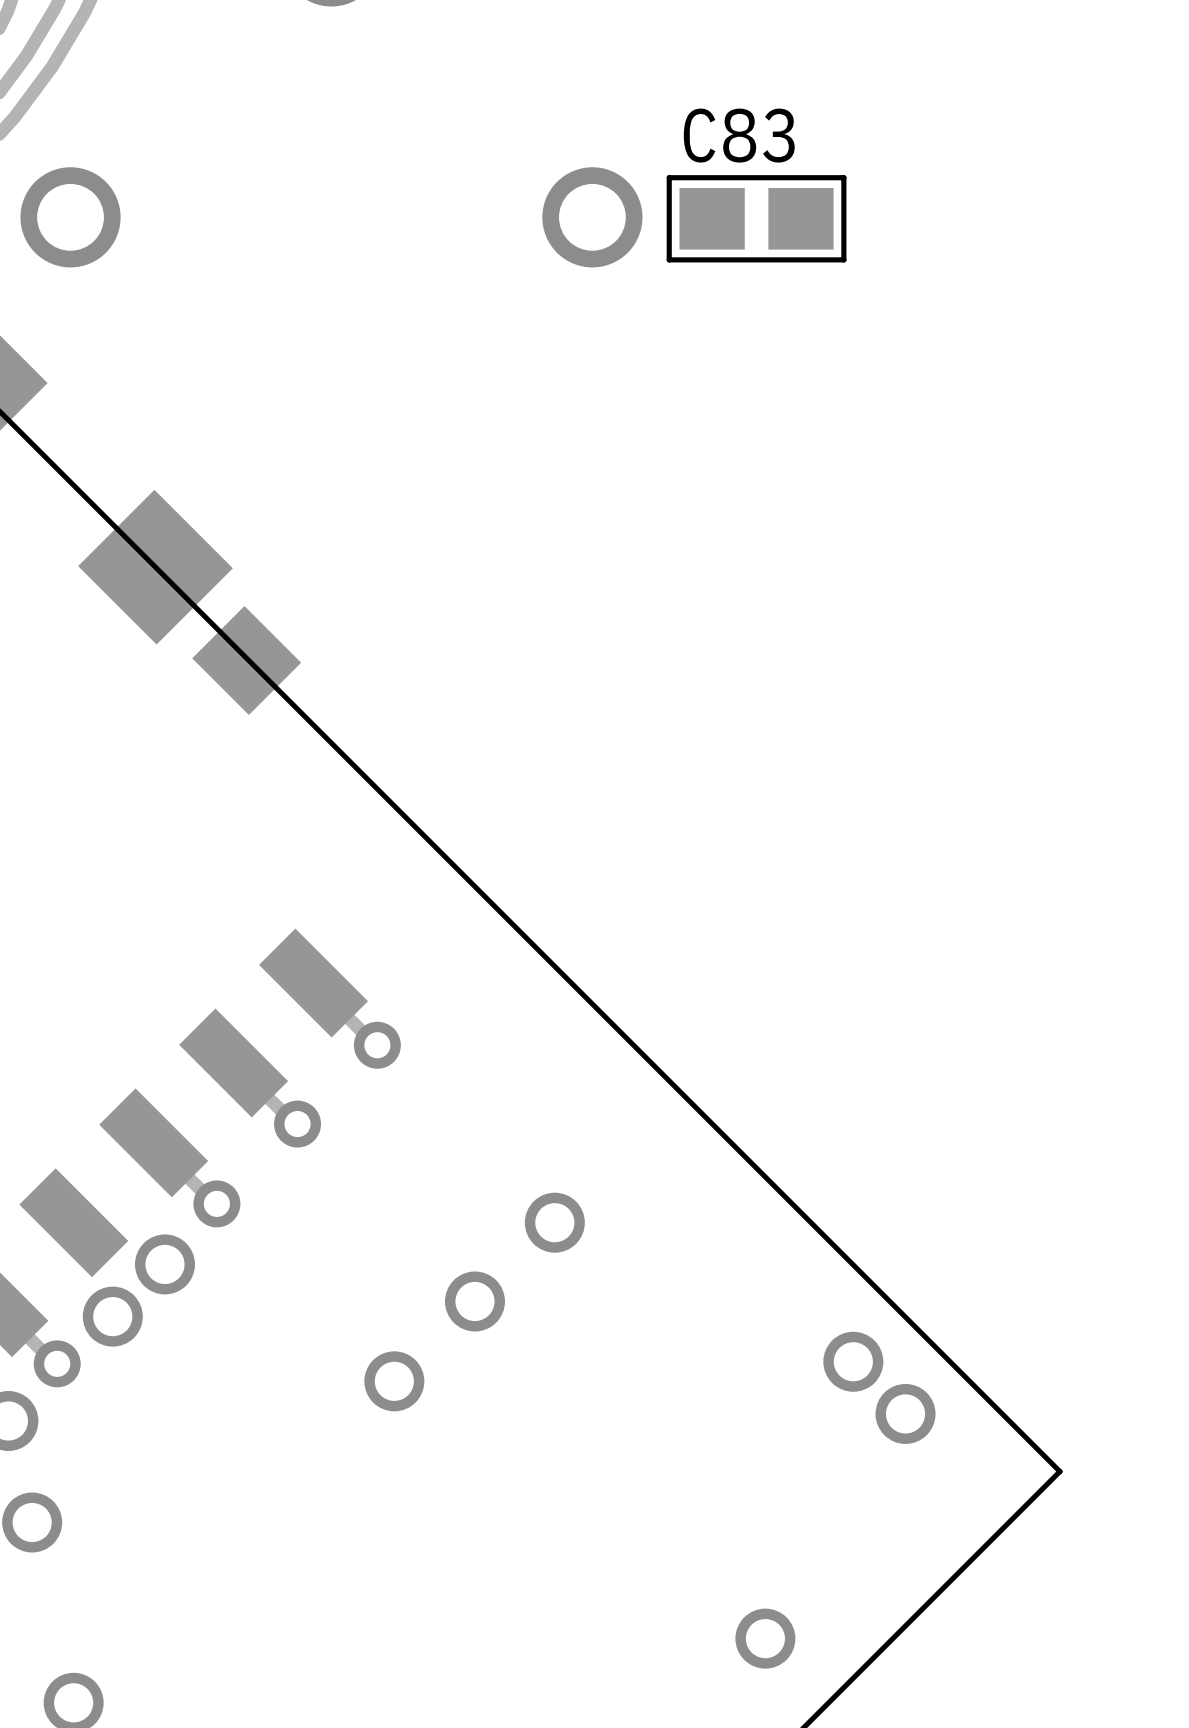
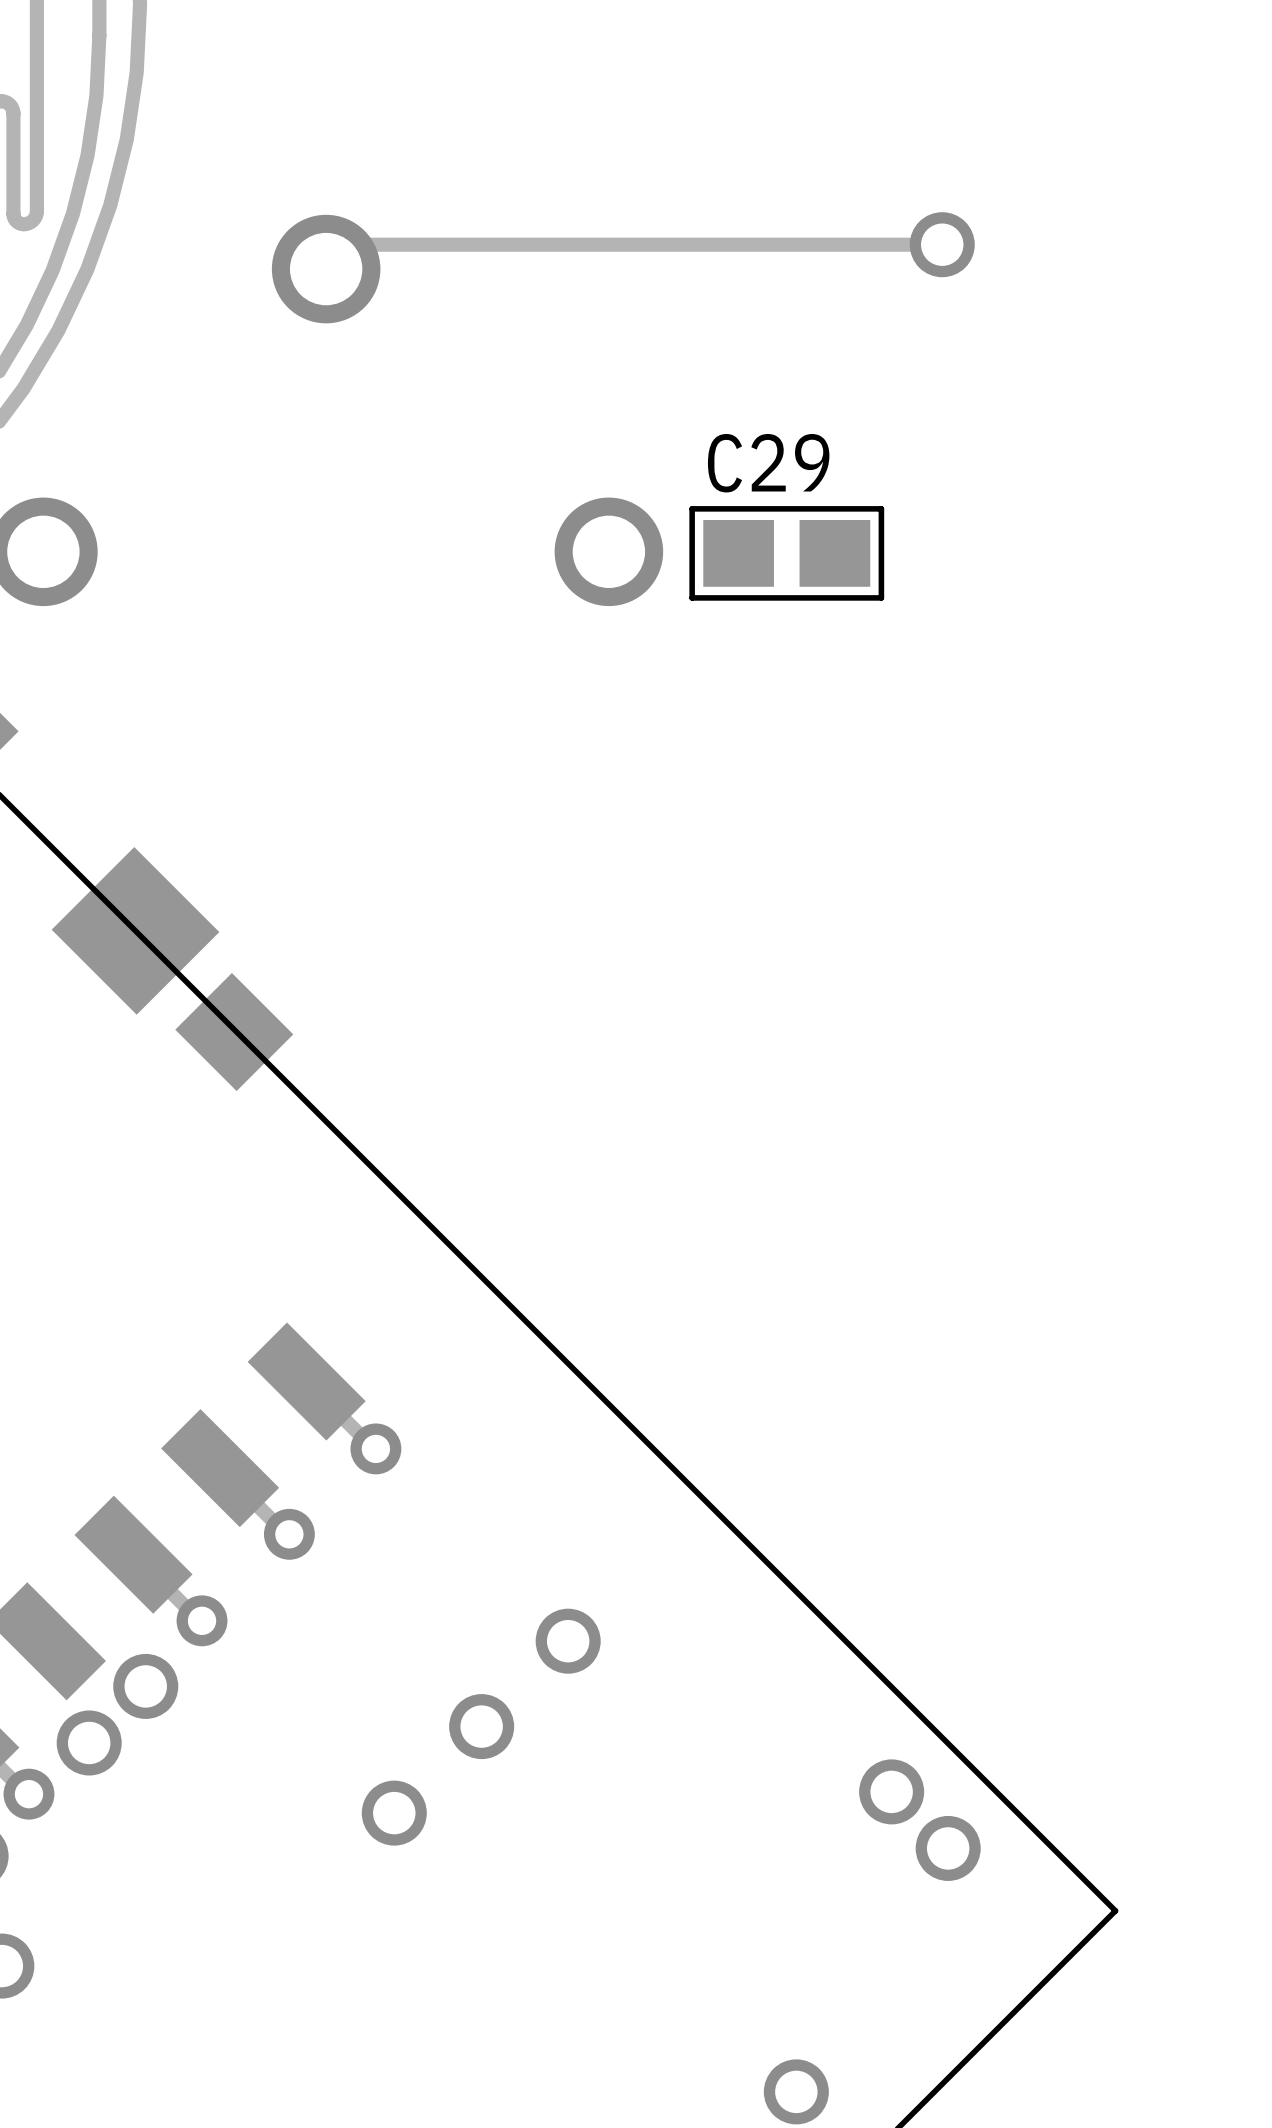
C83 name: C83 (739, 135) -> C29 (768, 463)

